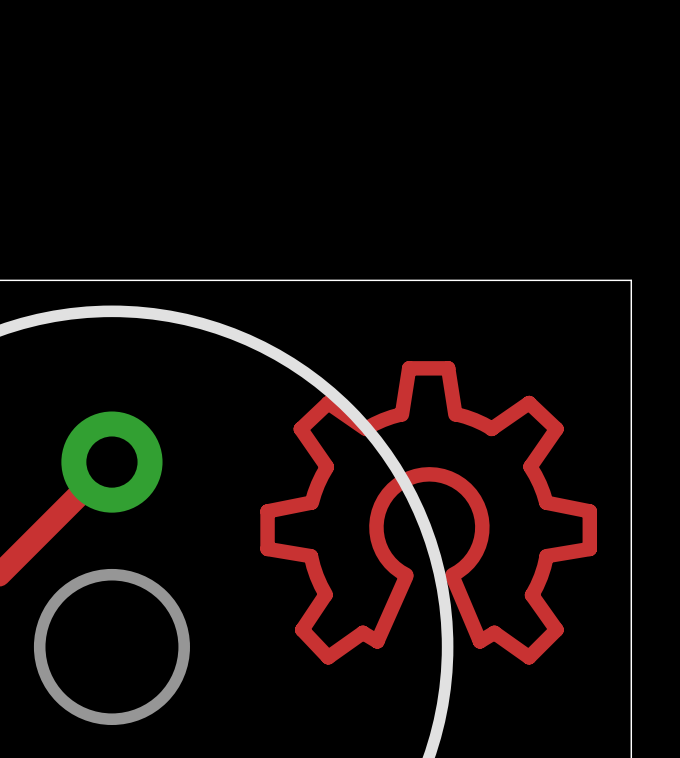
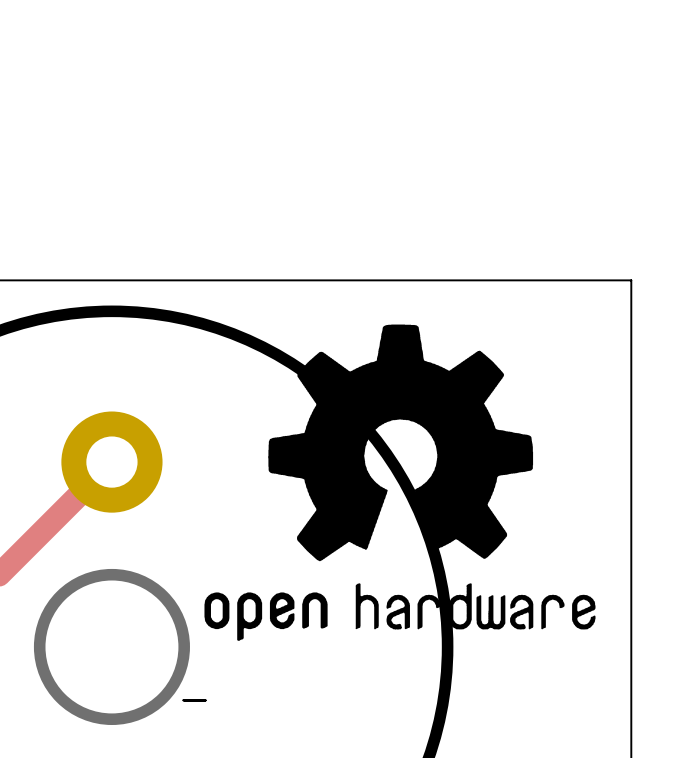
drawing shape: [260, 361, 598, 665] -> [183, 324, 596, 701]

